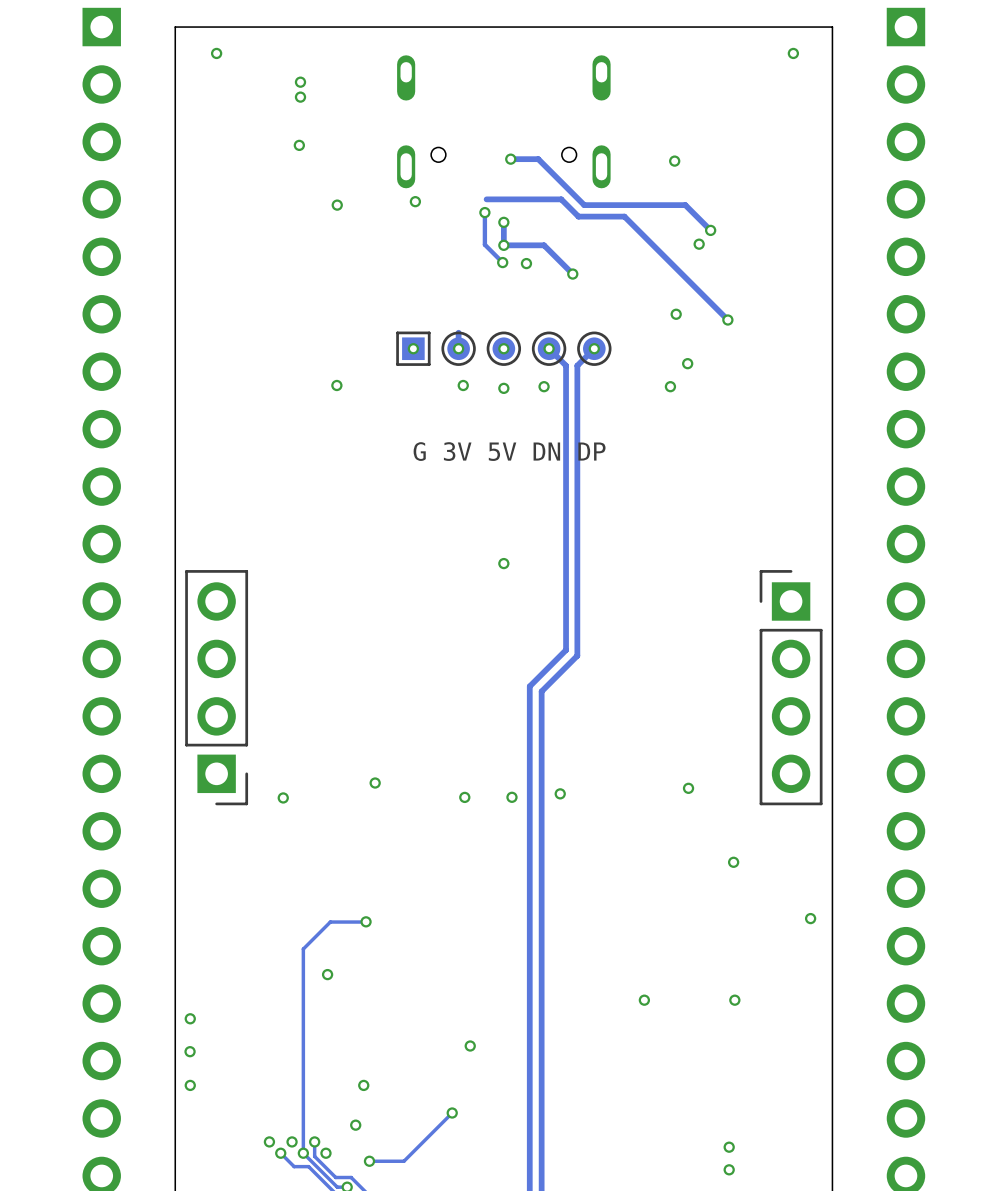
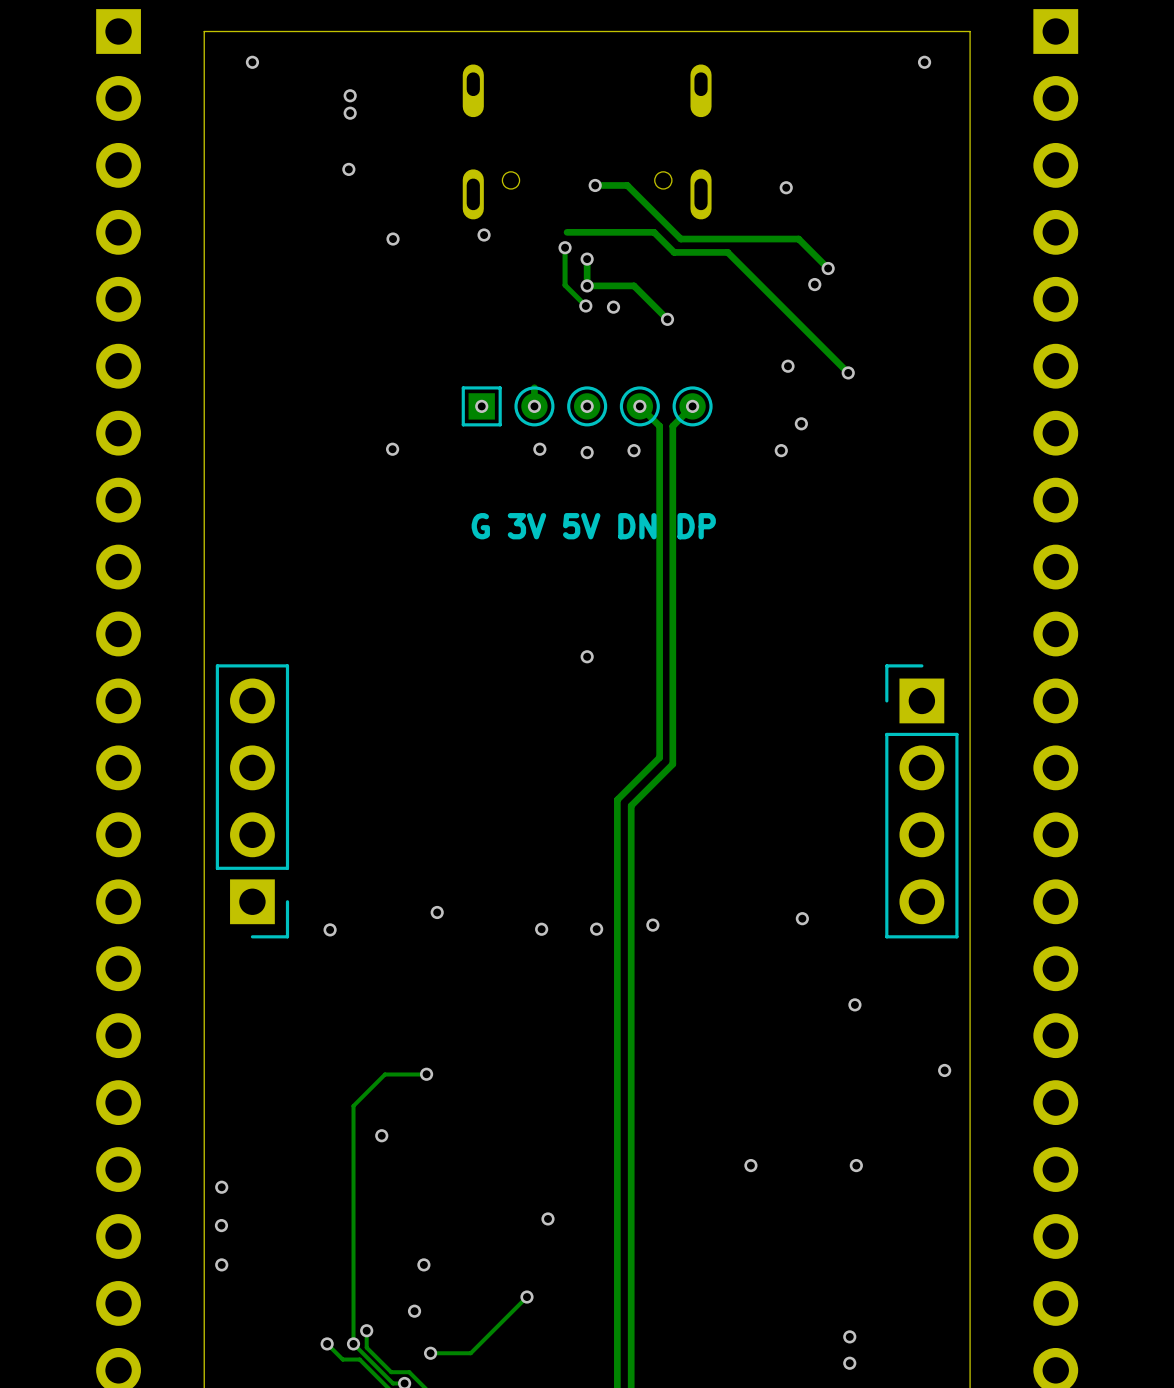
via: (269, 1141) -> none
via: (292, 1141) -> none
via: (325, 1153) -> none

